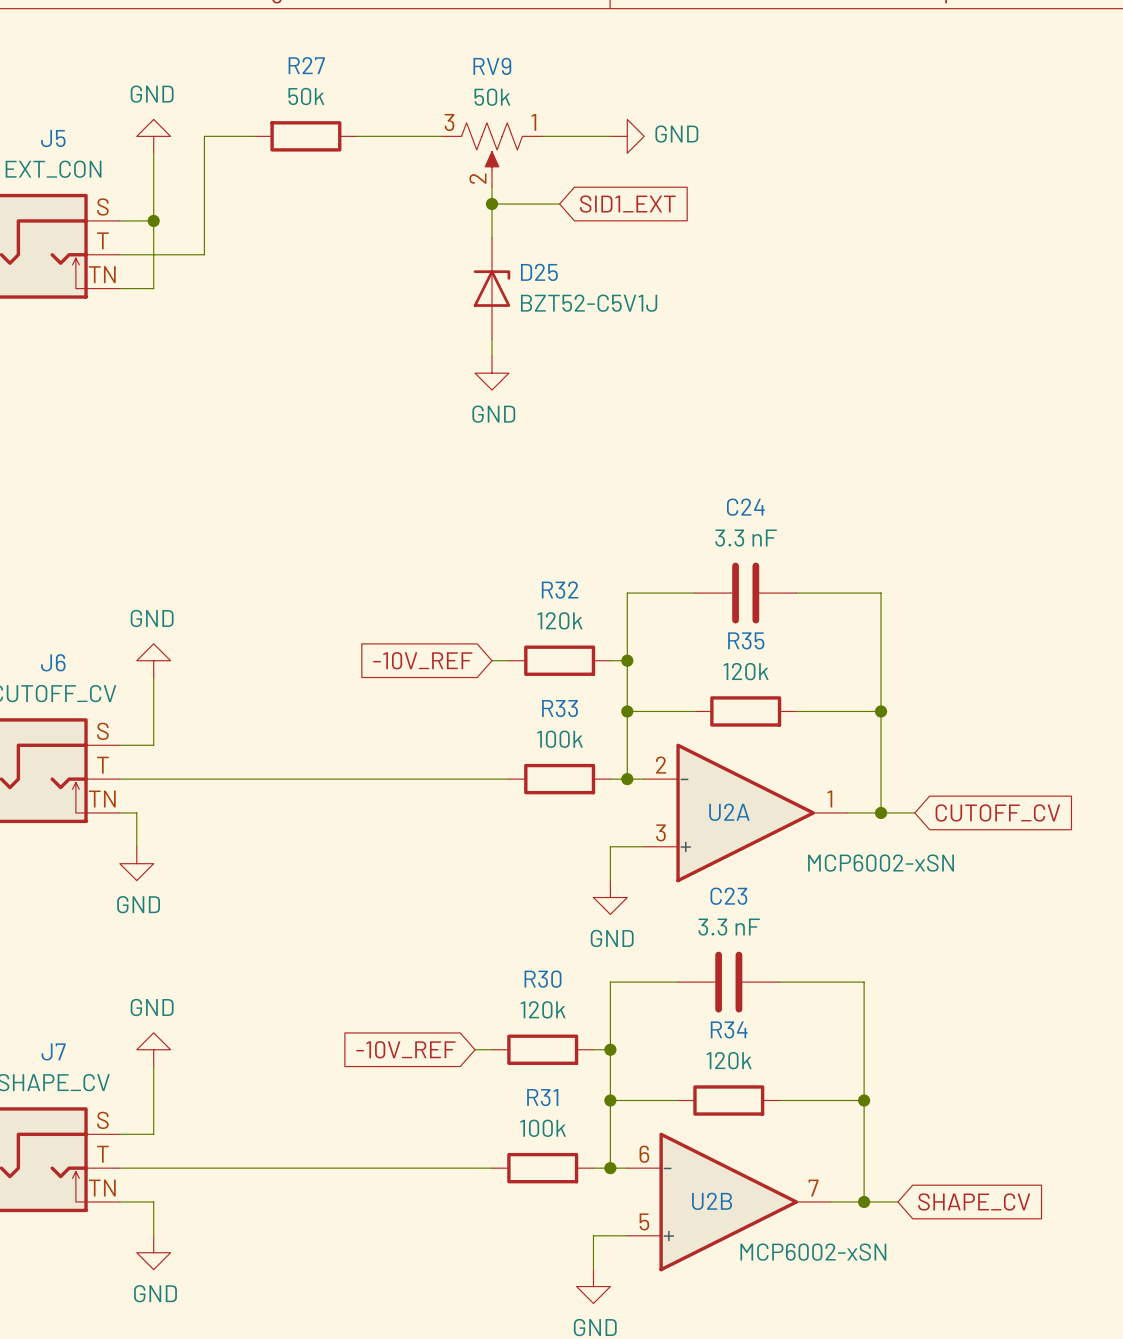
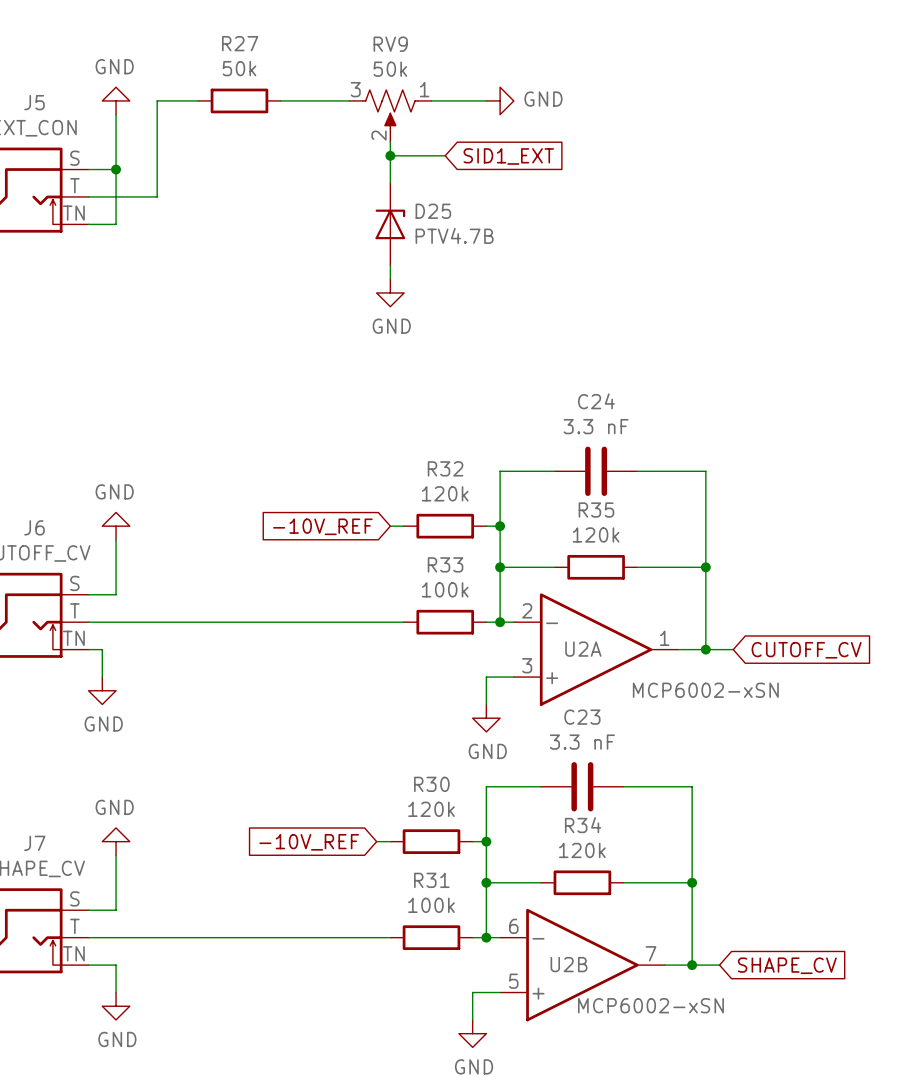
D25 value: BZT52-C5V1J (589, 303) -> PTV4.7B (454, 235)

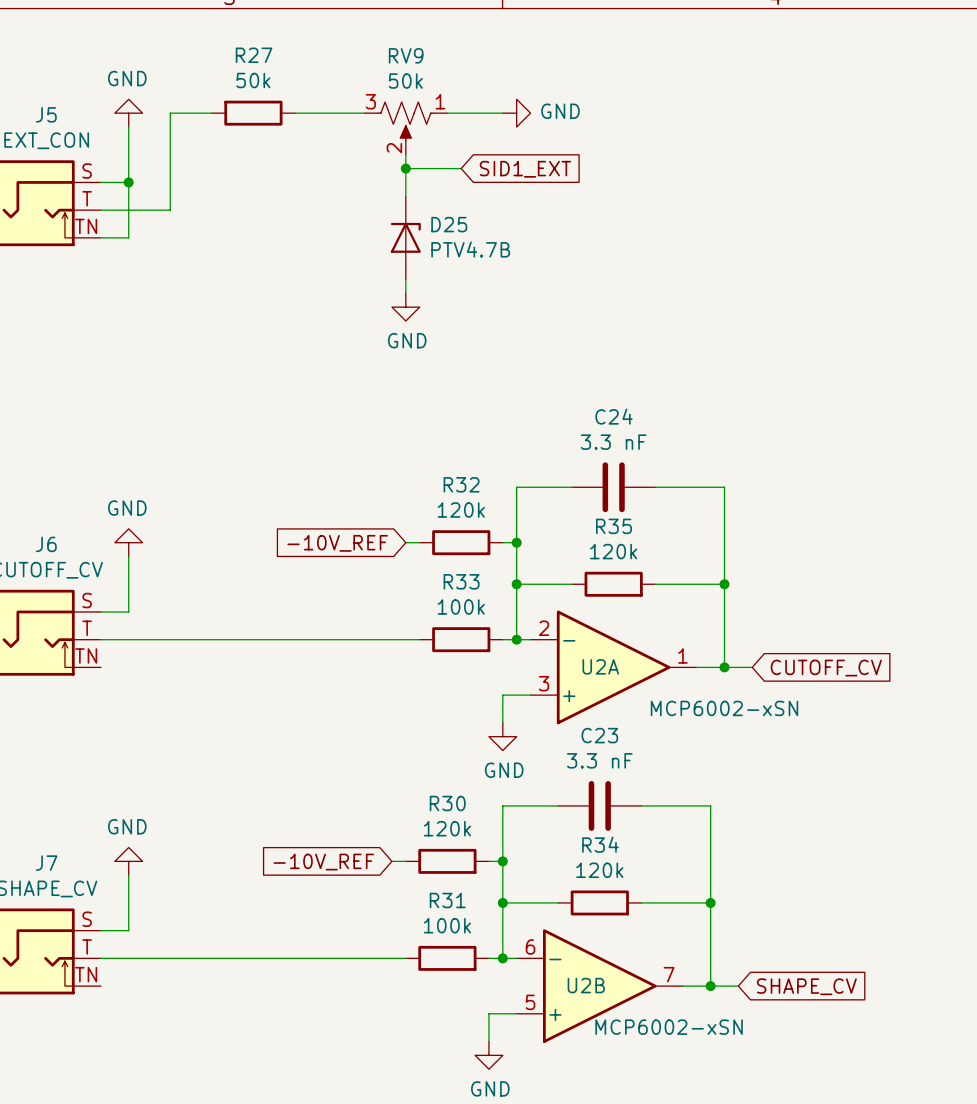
wire: (88, 649) (102, 649) (102, 677) -> none
power symbol: GND (102, 690) -> none
wire: (88, 965) (116, 965) (116, 992) -> none
power symbol: GND (116, 1006) -> none

